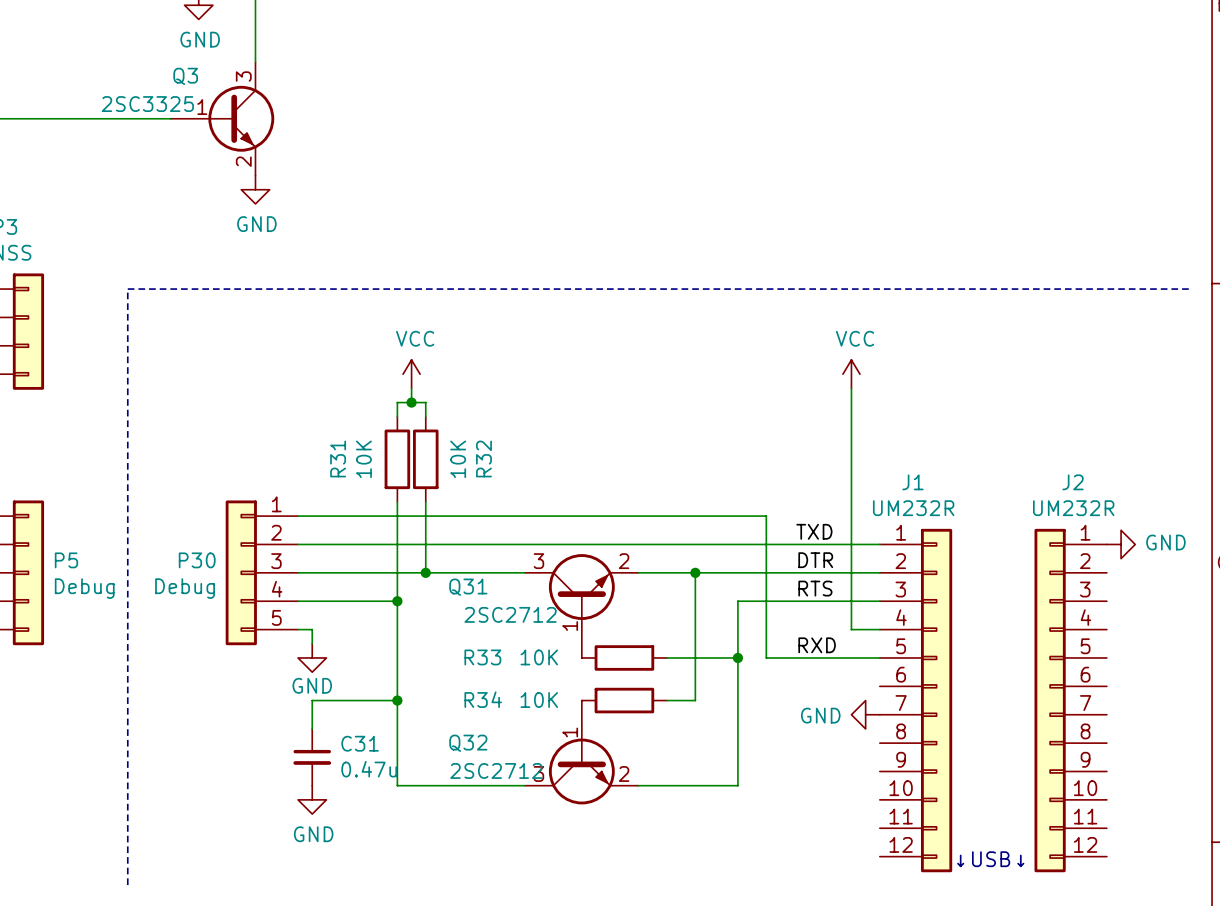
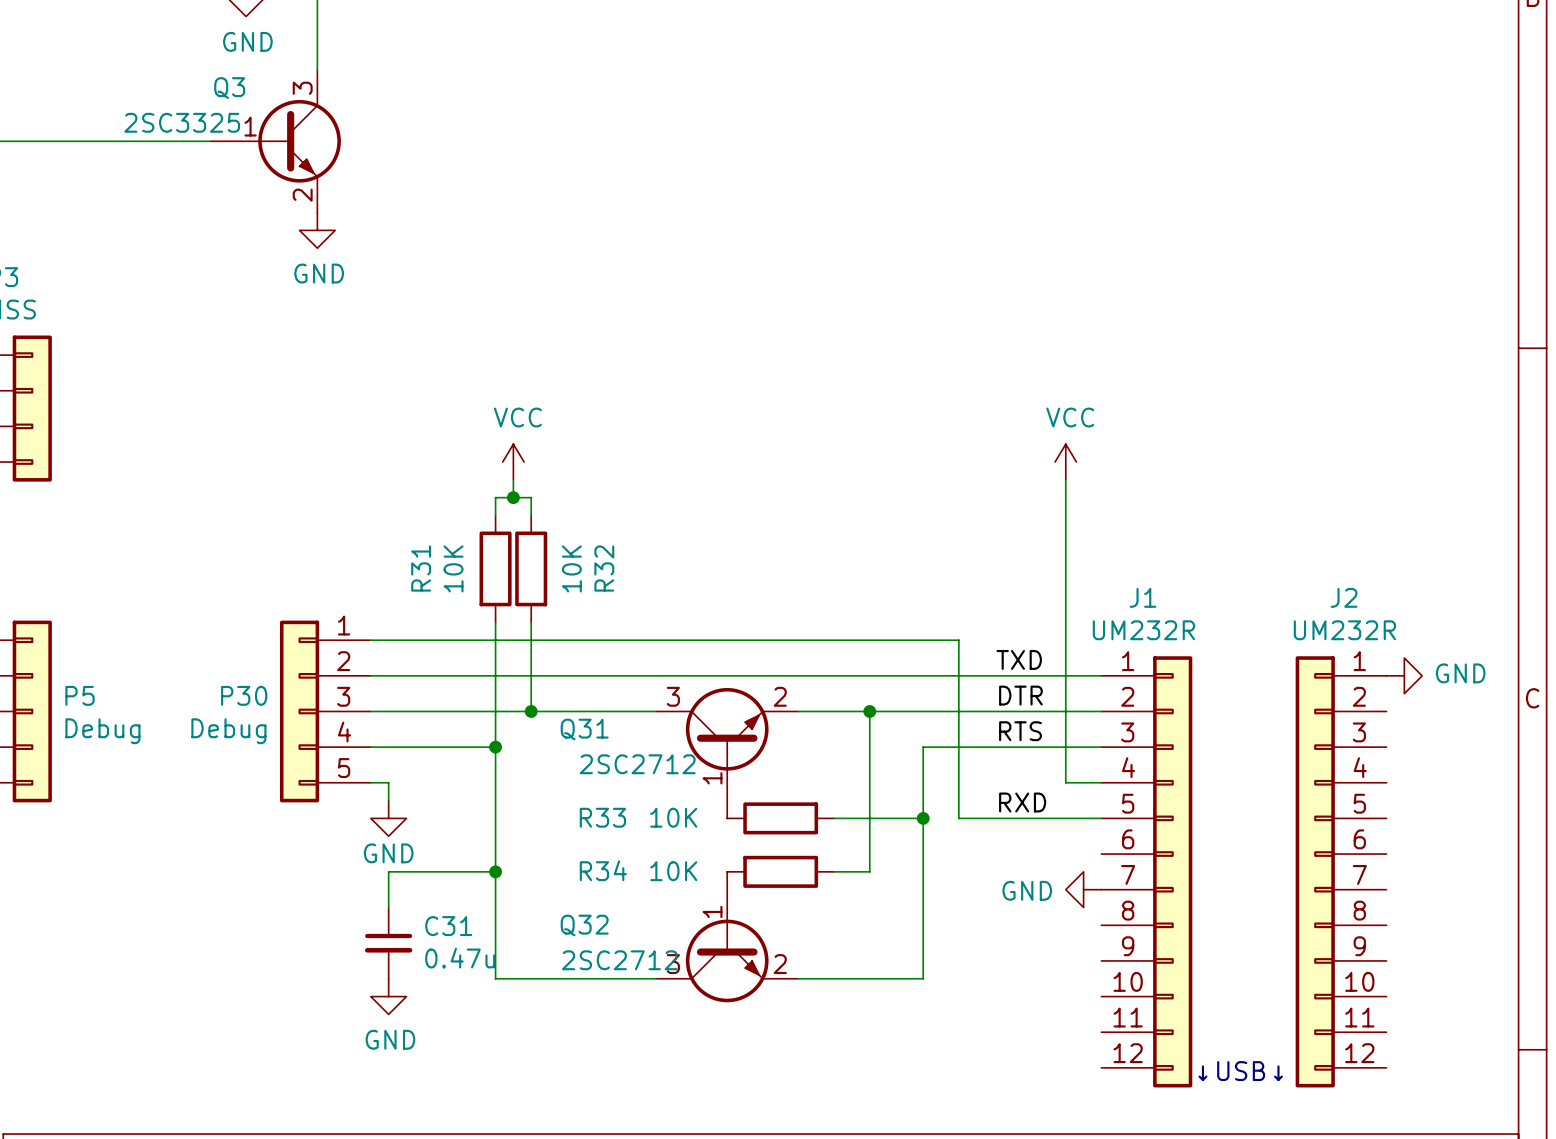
line: (1192, 289) (127, 289) (127, 885) -> none

